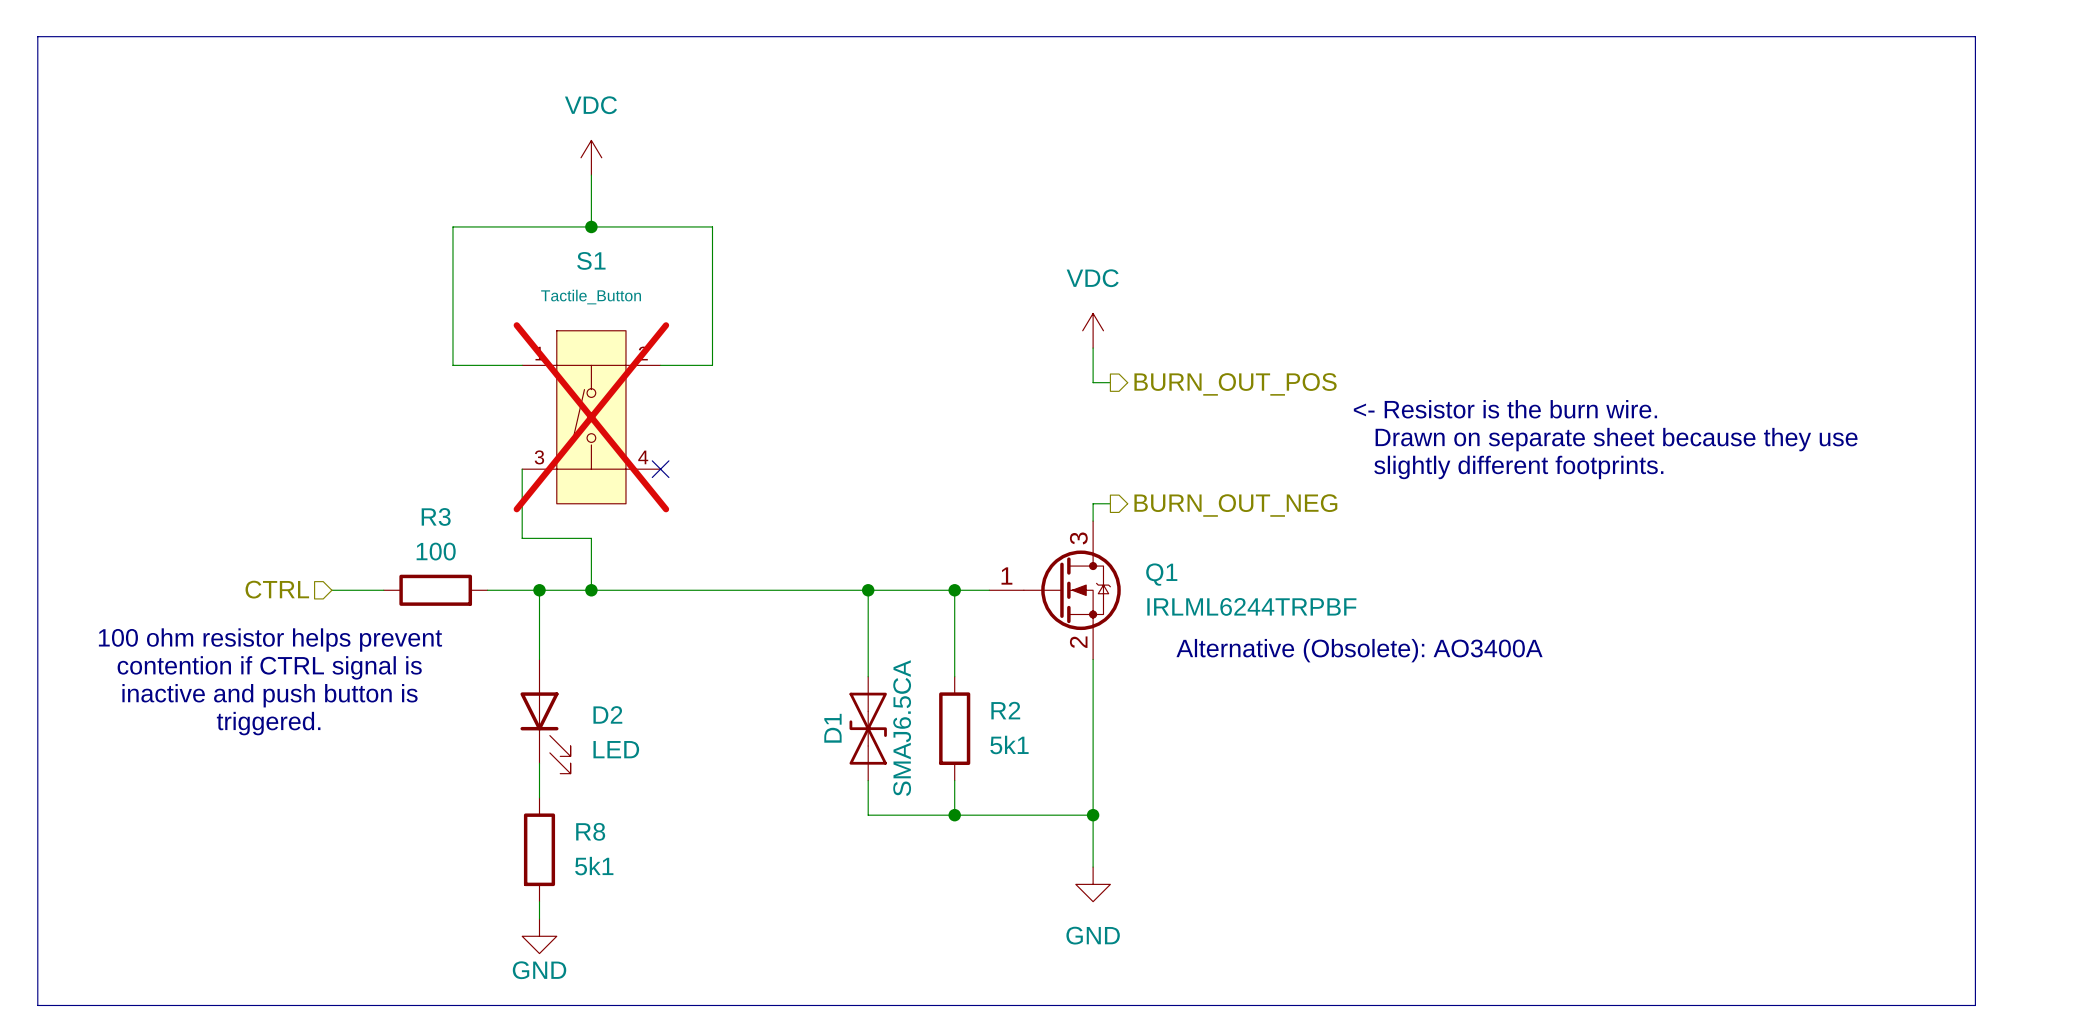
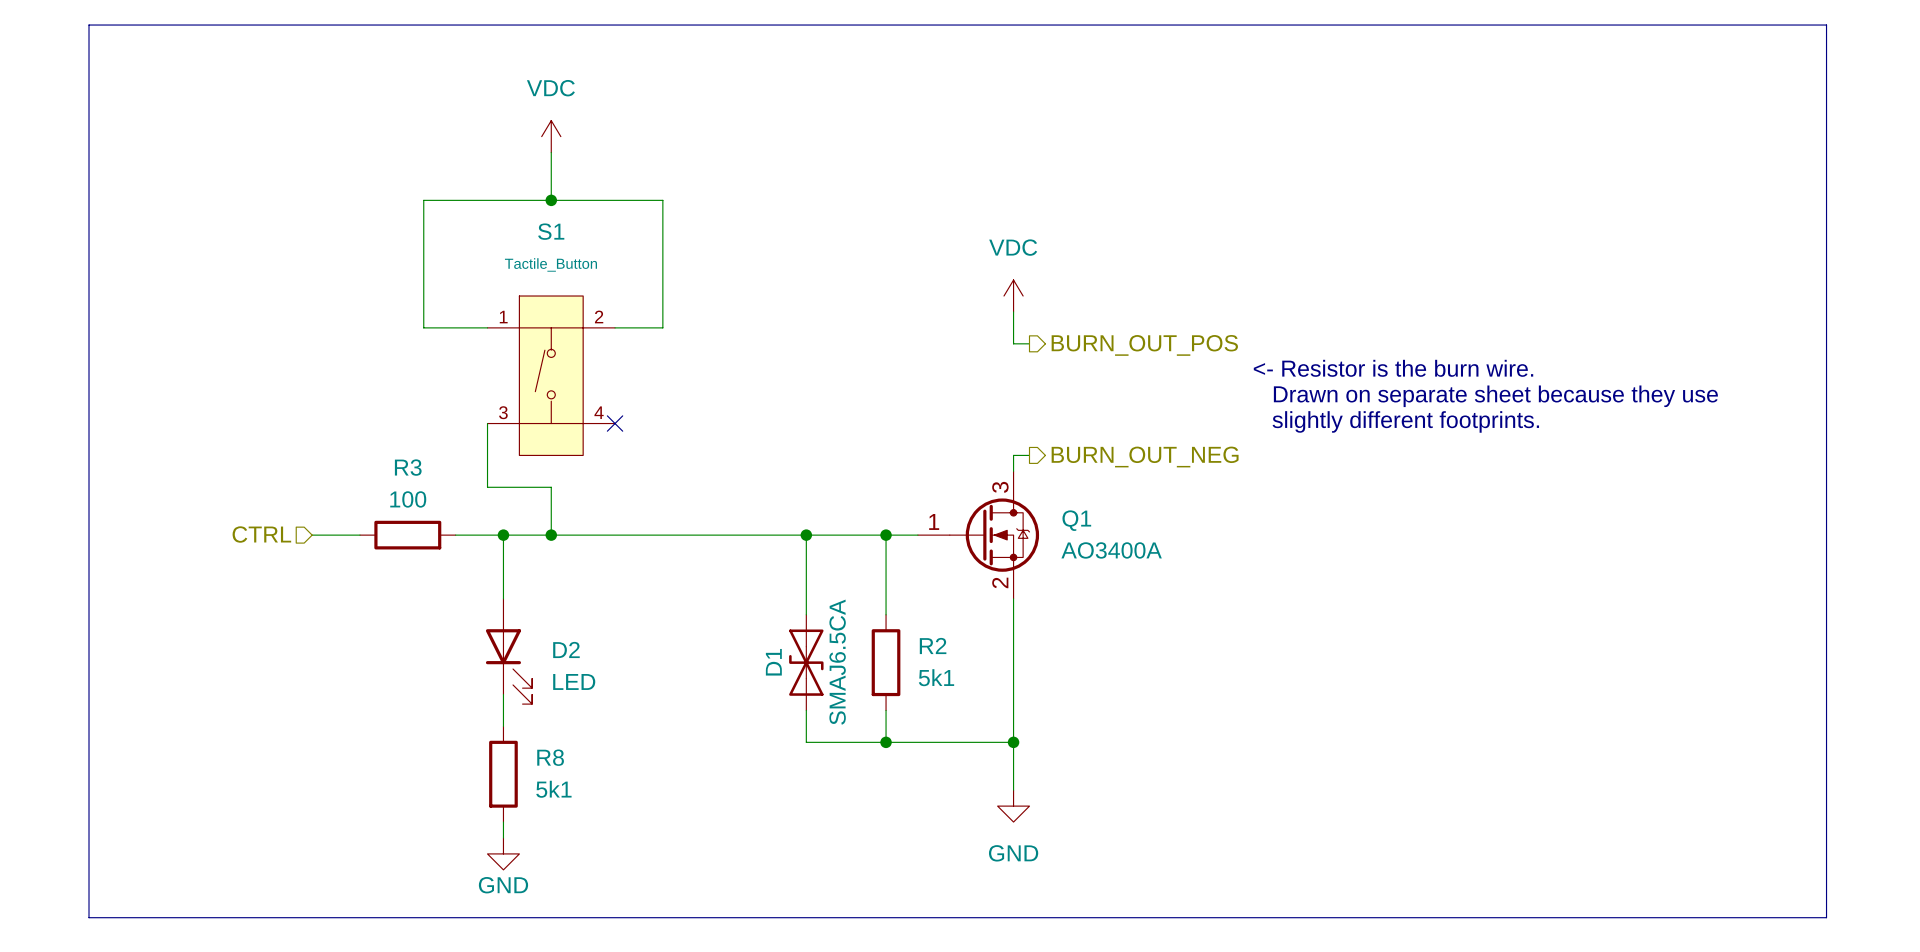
line: (89, 36) (37, 36) (37, 1005) (89, 1005) -> (89, 25) (89, 917)
S1 do-not-place cross: (591, 417) -> none
Q1 value: IRLML6244TRPBF (1251, 606) -> AO3400A (1111, 550)
text: 100 ohm resistor helps prevent (270, 640) -> none
text: Alternative (Obsolete): AO3400A (1359, 650) -> none
text: contention if CTRL signal is (269, 667) -> none
text: inactive and push button is (270, 695) -> none
text: triggered. (268, 723) -> none

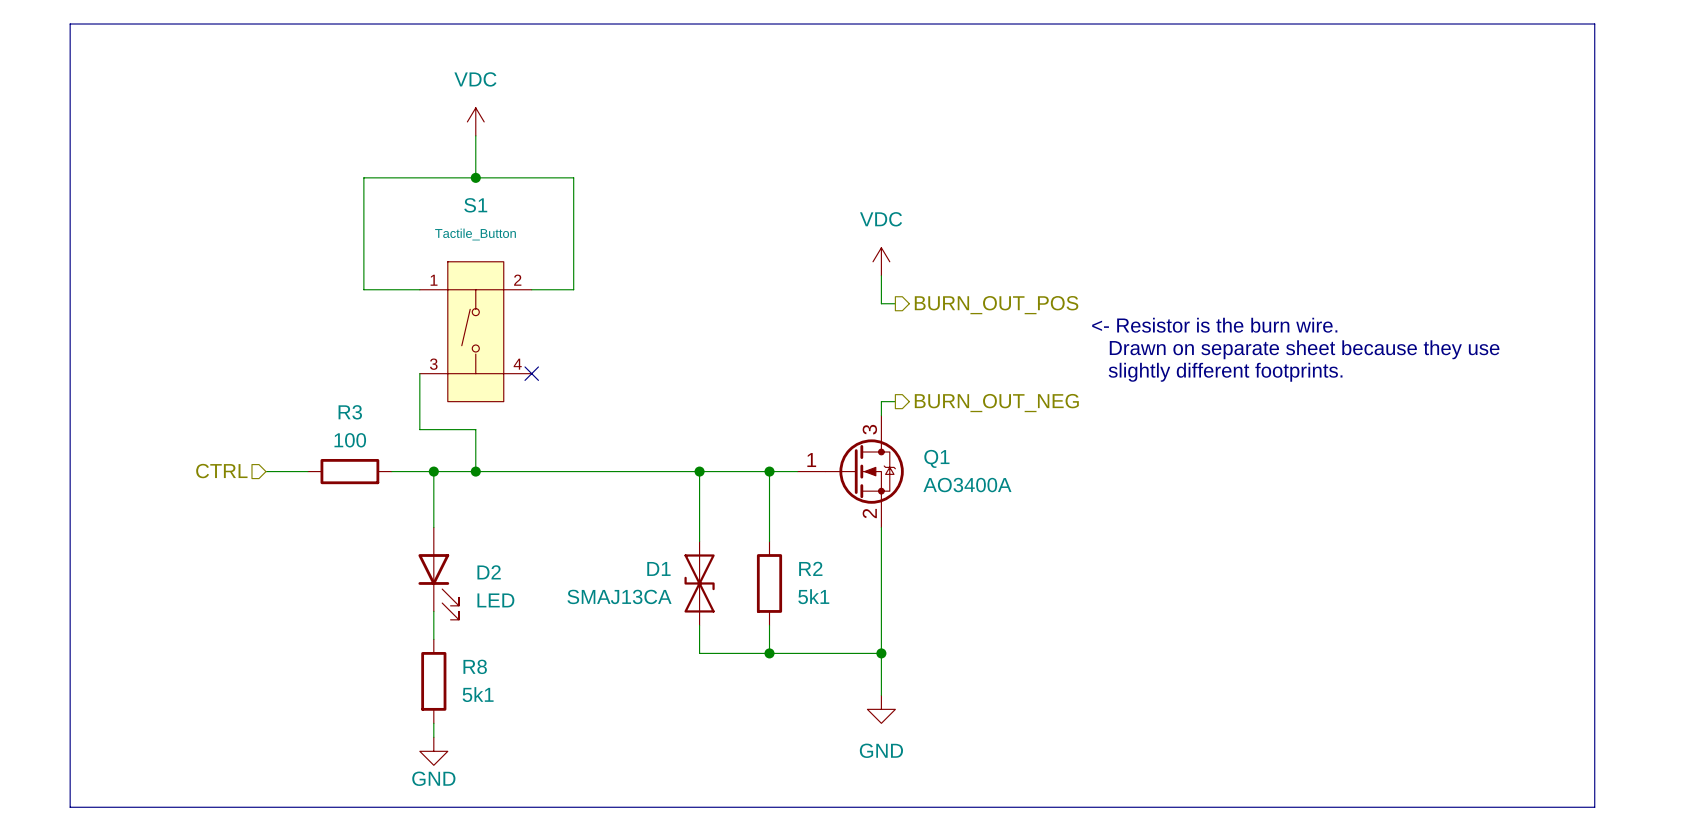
D1 name rotation: 0° (773, 662) -> 90° clockwise (658, 568)
D1 value: SMAJ6.5CA (837, 662) -> SMAJ13CA (619, 596)

